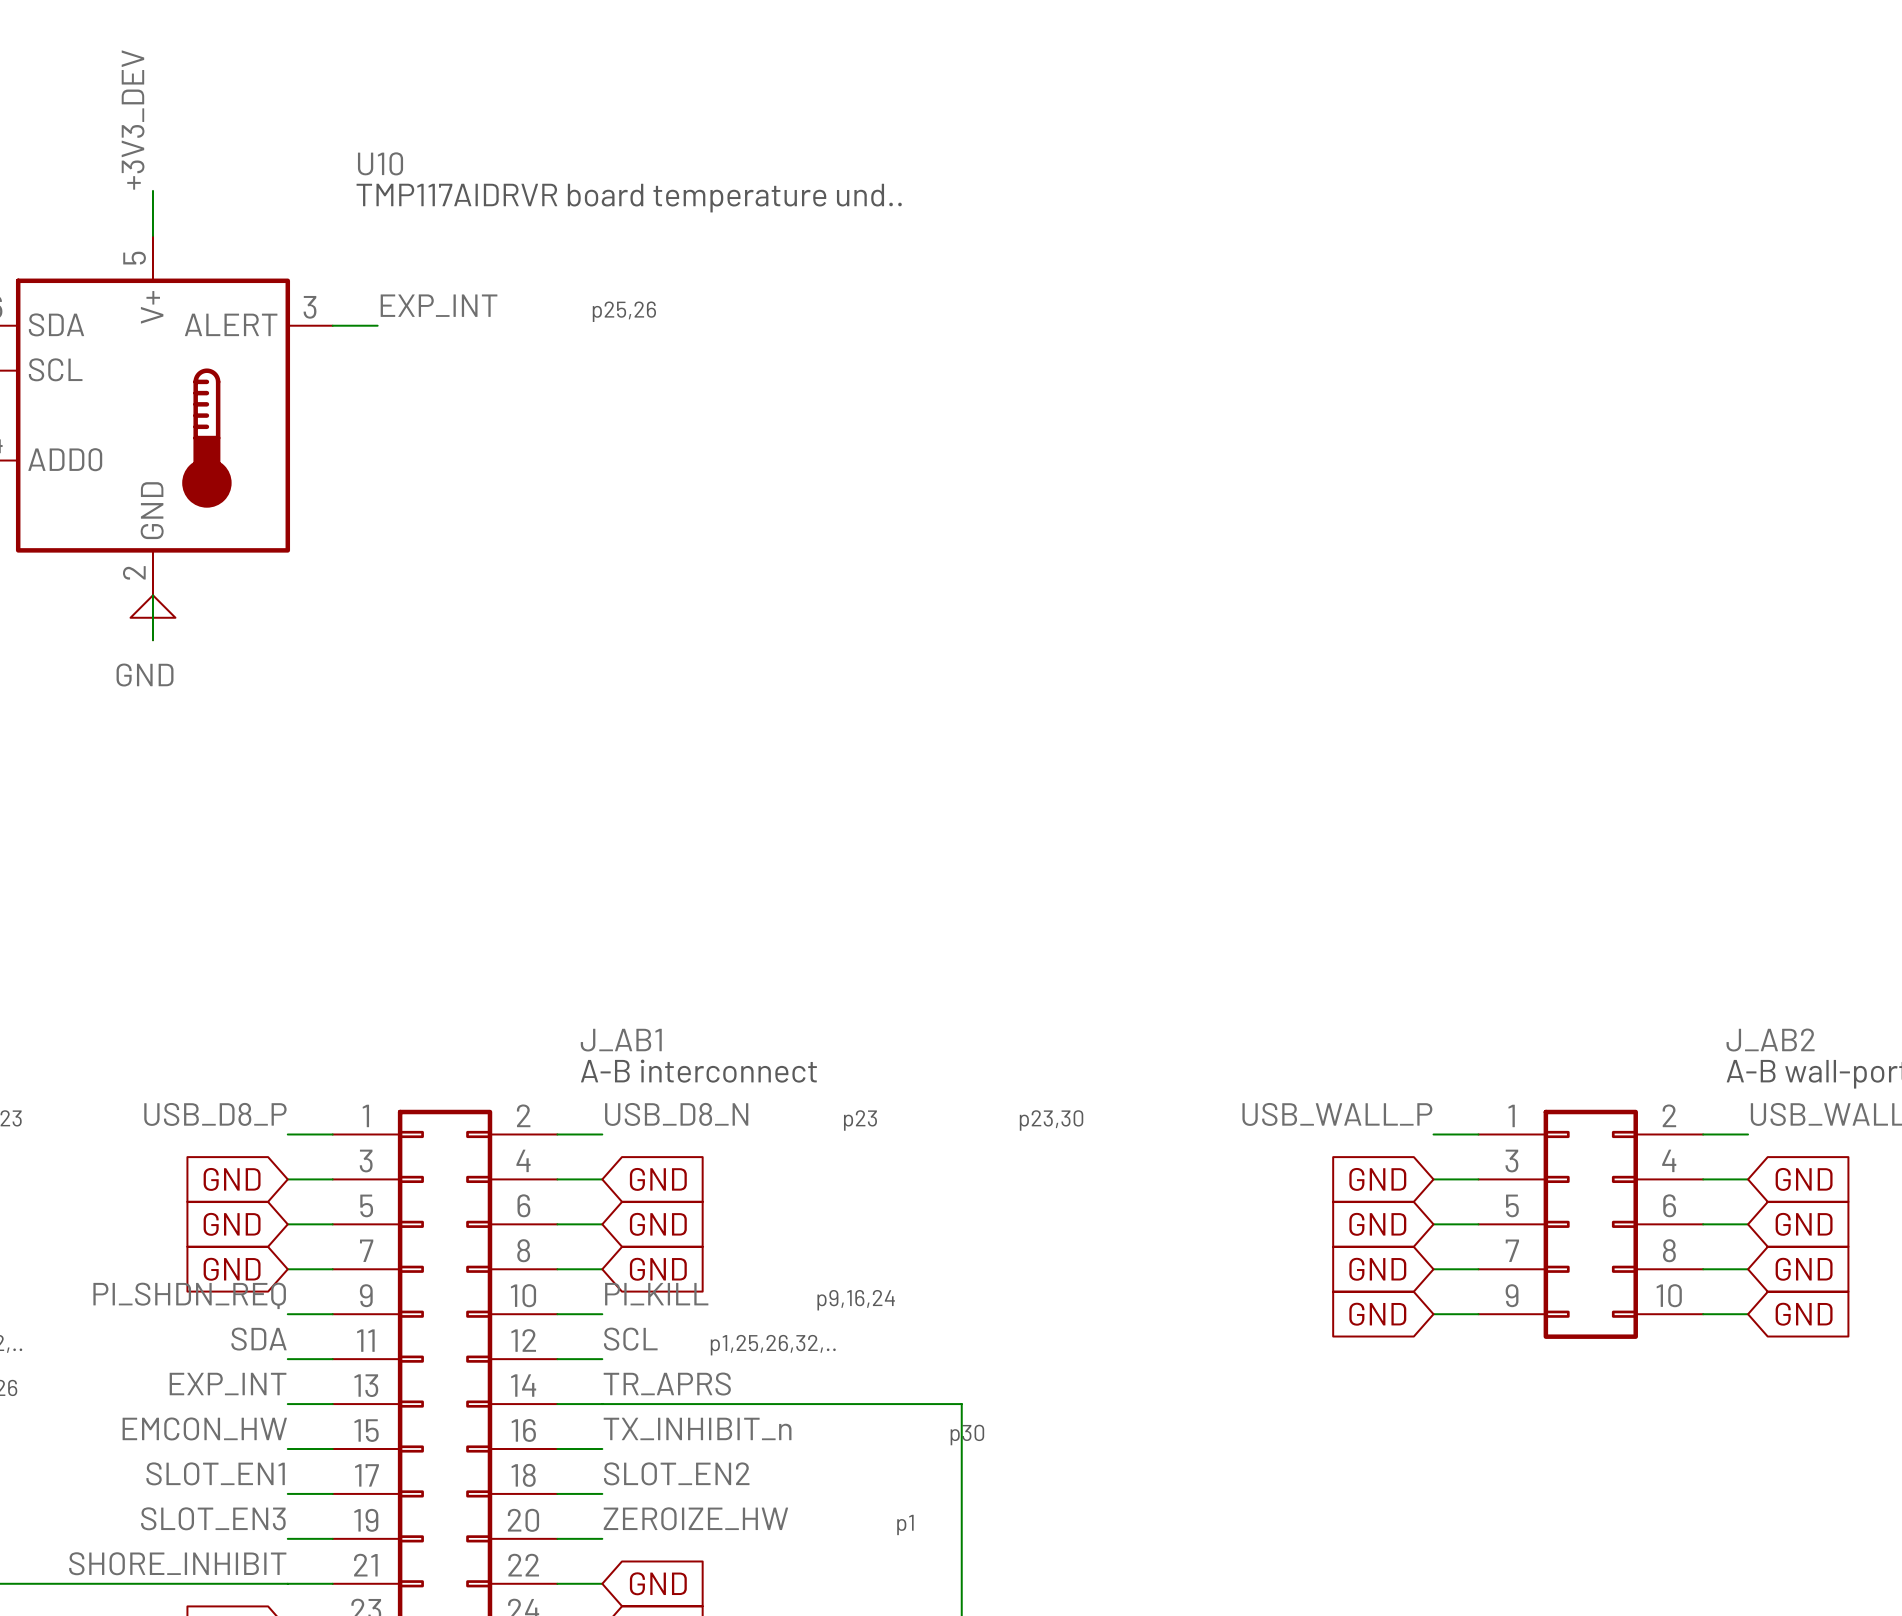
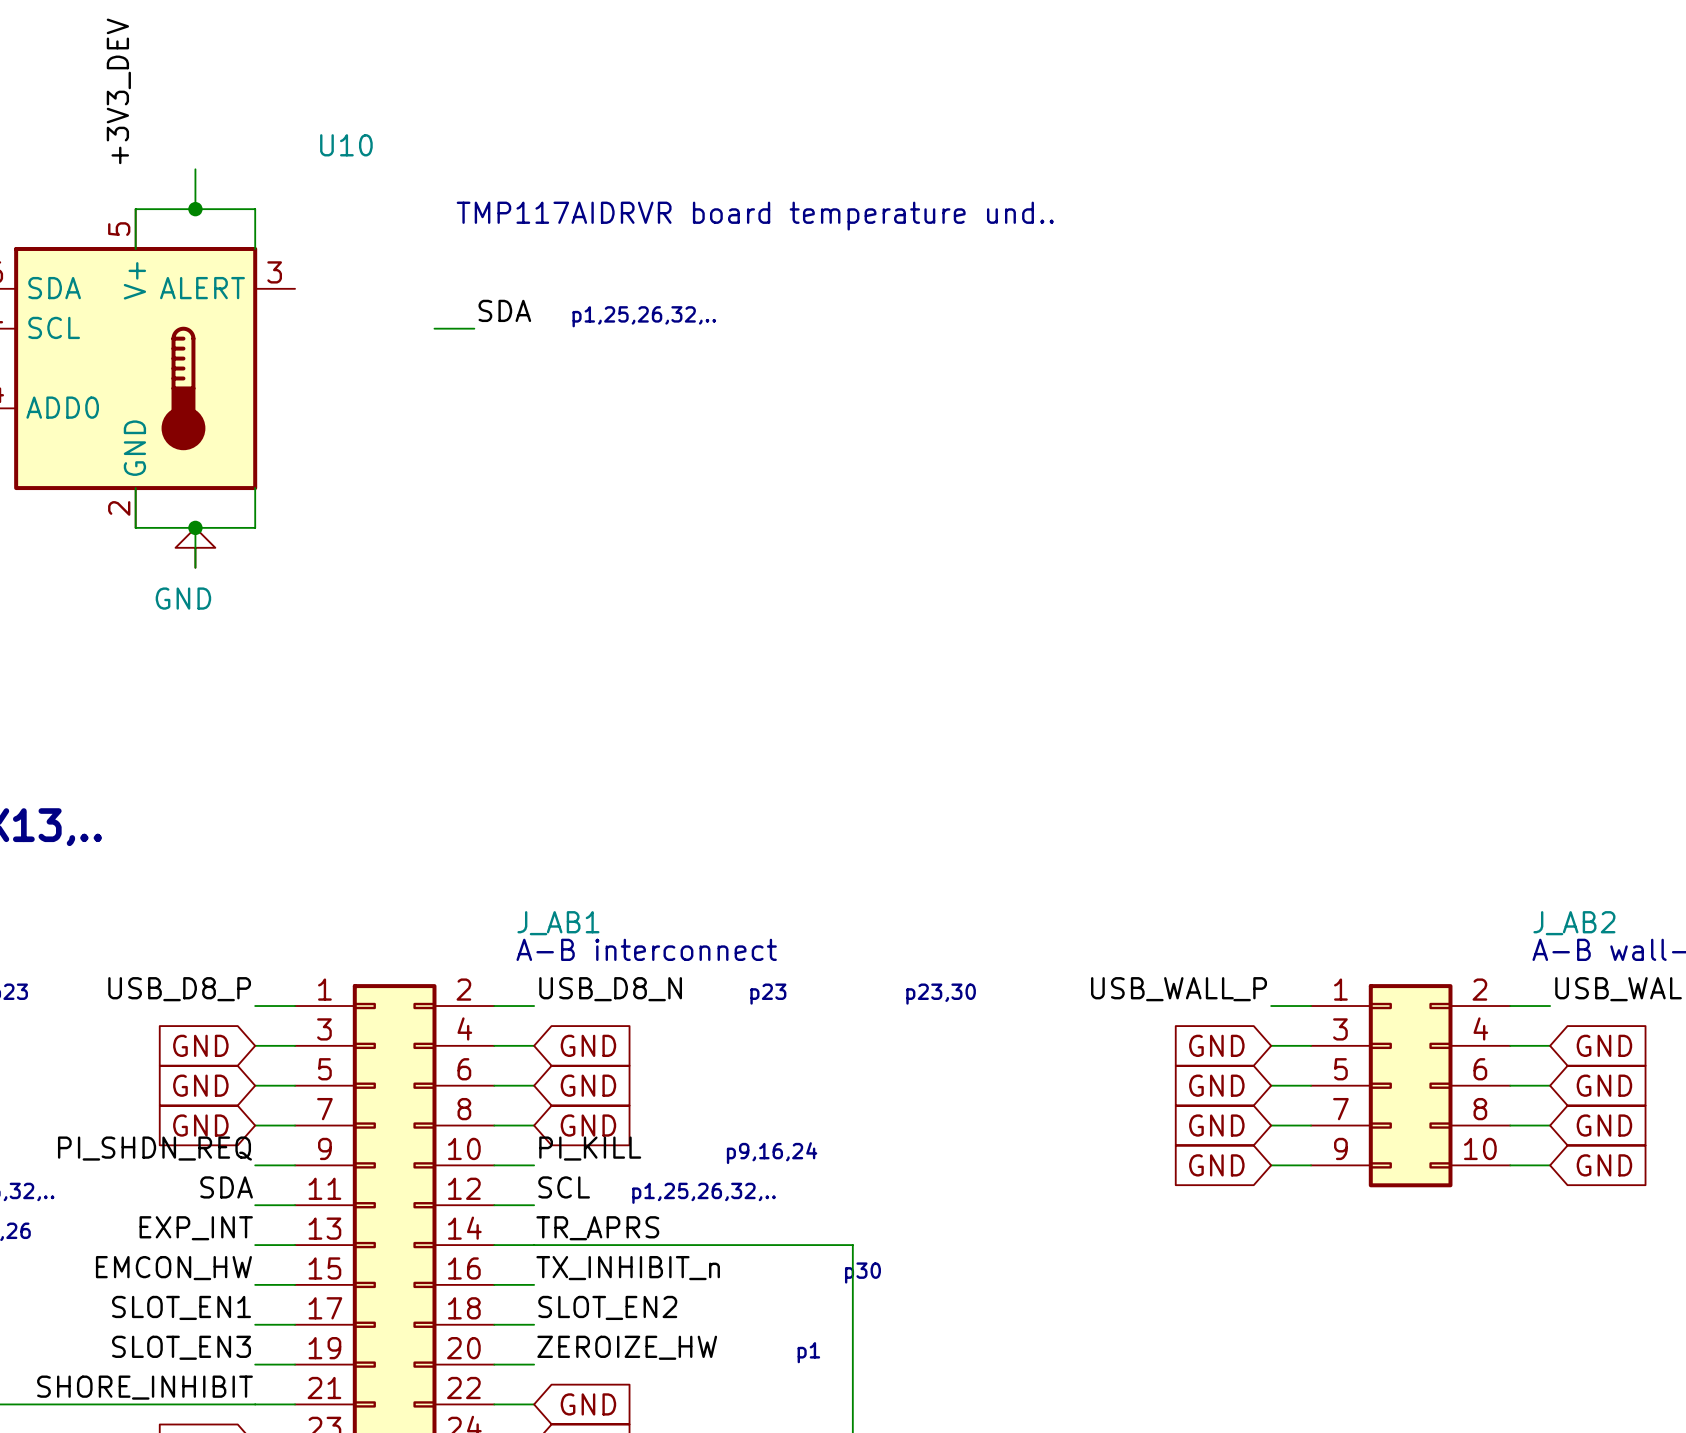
wire: (152, 190) (152, 235) -> (195, 169) (195, 209)
text position: TMP117AIDRVR board temperature und.. (629, 198) -> TMP117AIDRVR board temperature und.. (755, 216)
junction: none -> (195, 209)
wire: none -> (135, 248) (135, 209) (255, 209) (255, 248)
label: EXP_INT (439, 305) -> none
text: p25,26 (624, 311) -> none
wire: (332, 325) (377, 325) -> (434, 328) (474, 328)
label: none -> SDA (504, 310)
text: none -> p1,25,26,32,.. (644, 316)
wire: none -> (135, 488) (135, 527) (255, 527) (255, 488)
wire: (152, 595) (152, 640) -> (195, 527) (195, 567)
junction: none -> (195, 527)
power symbol position: GND (152, 617) -> GND (195, 547)

